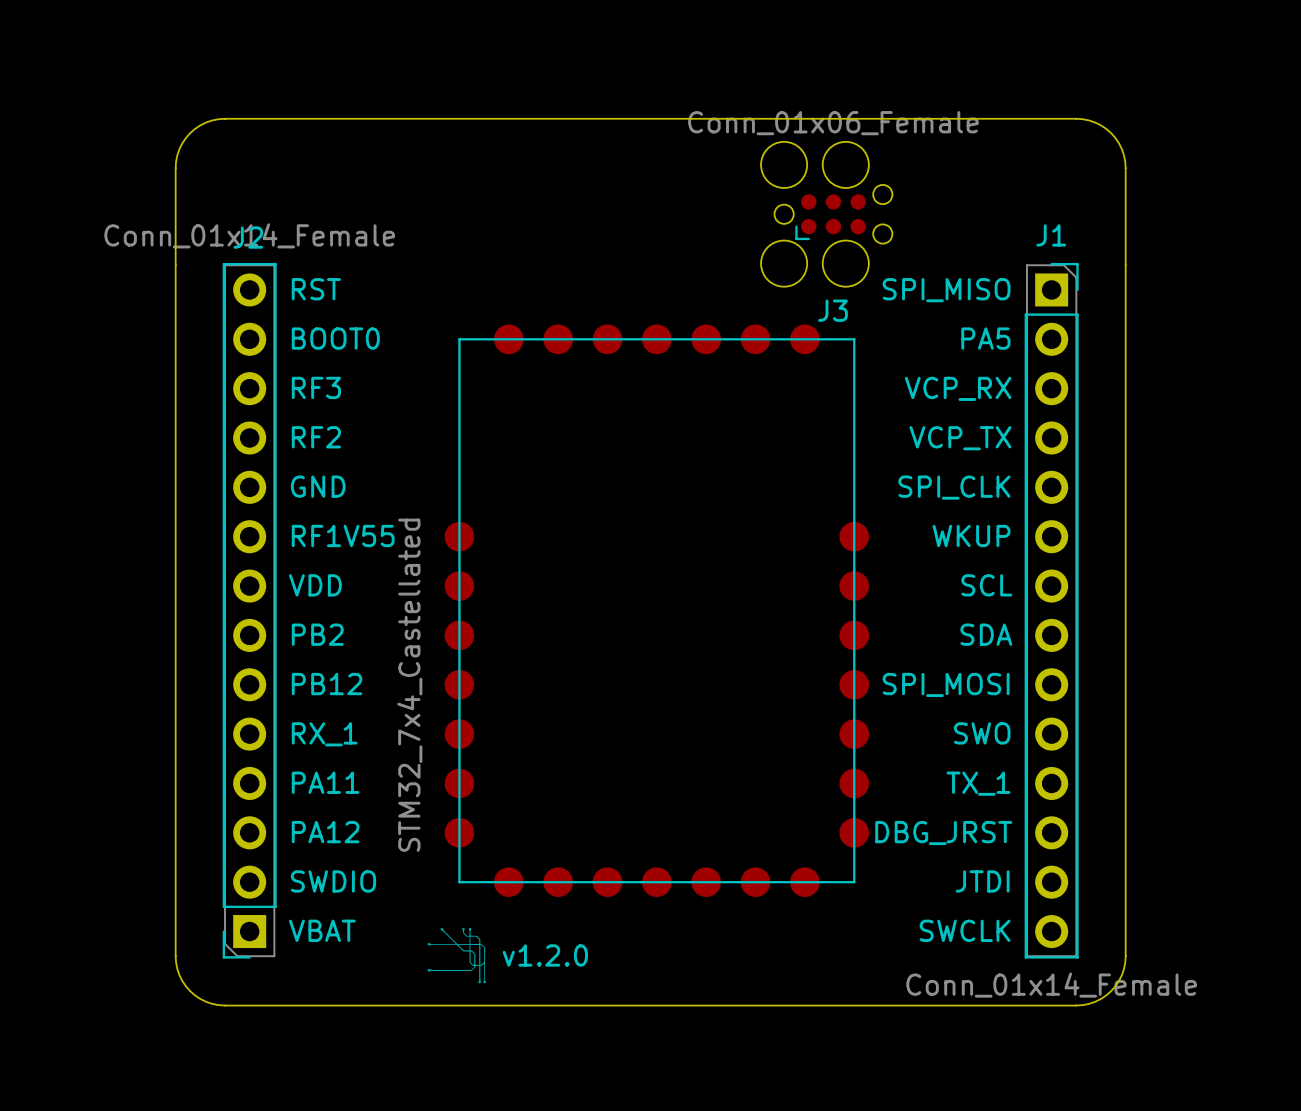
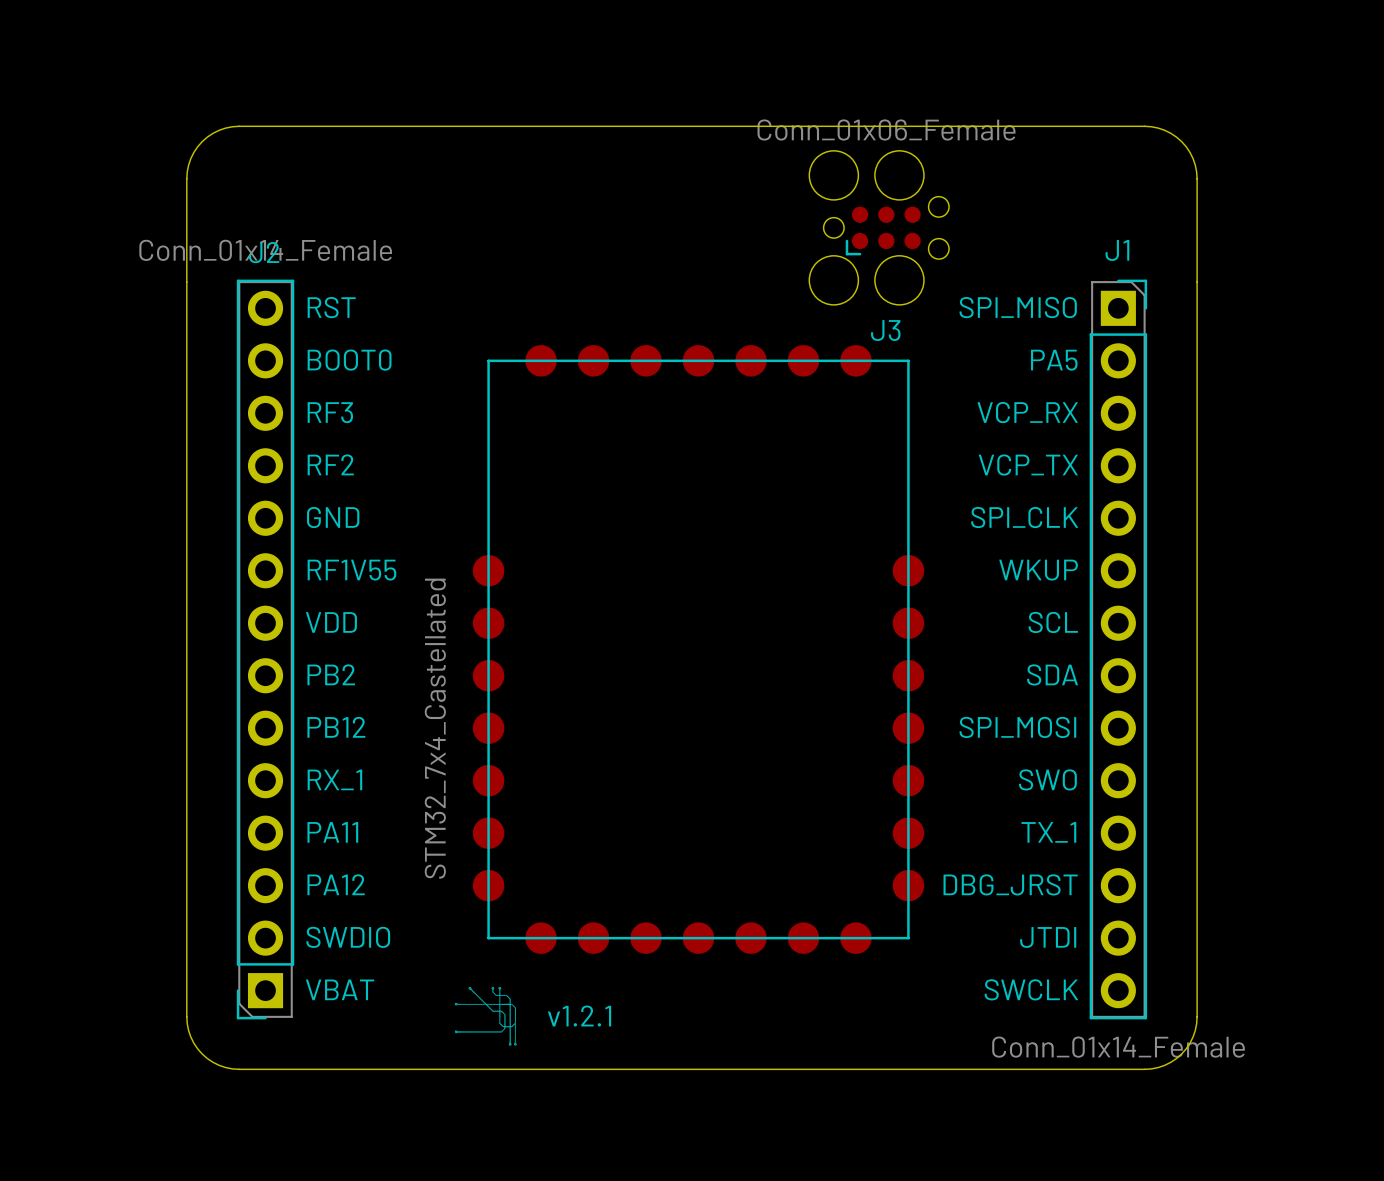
text: v1.2.0 (545, 955) -> v1.2.1 (579, 1016)

